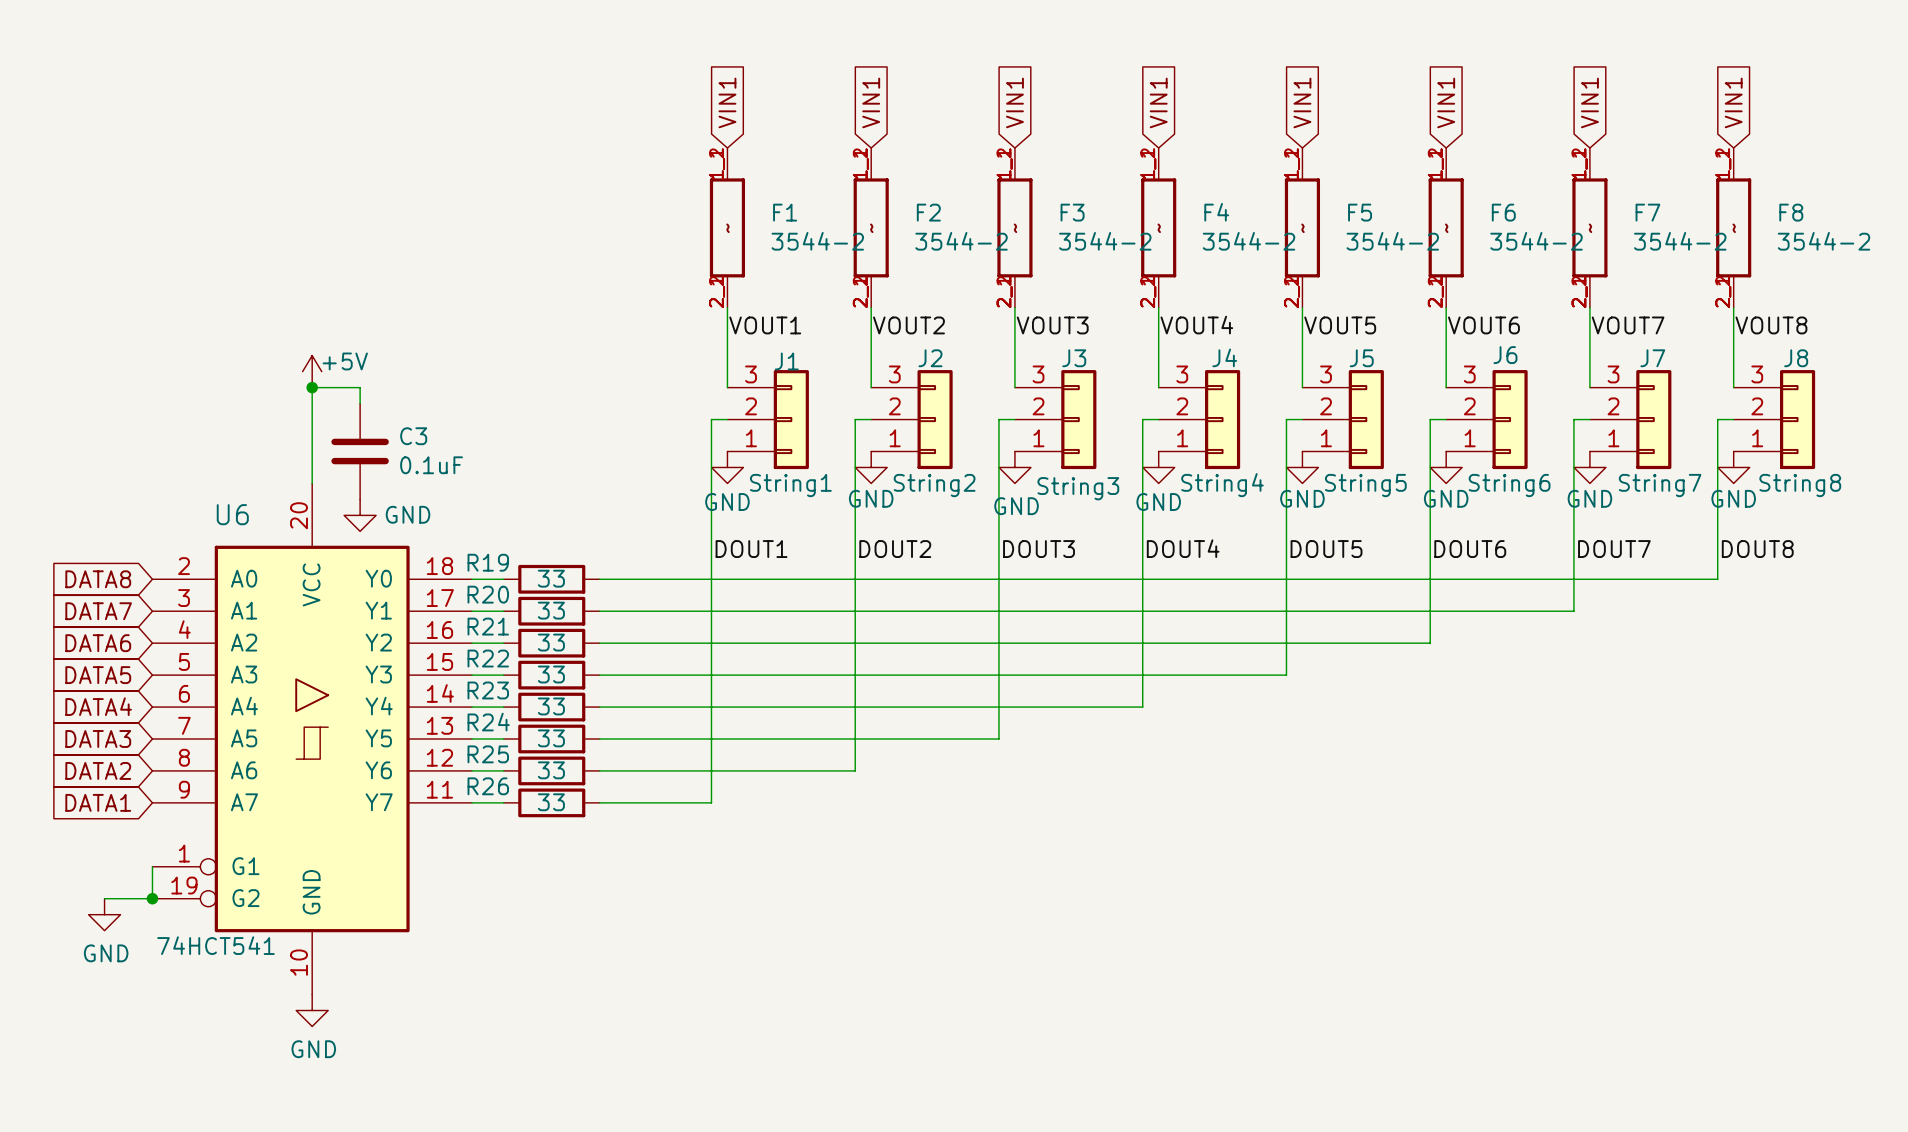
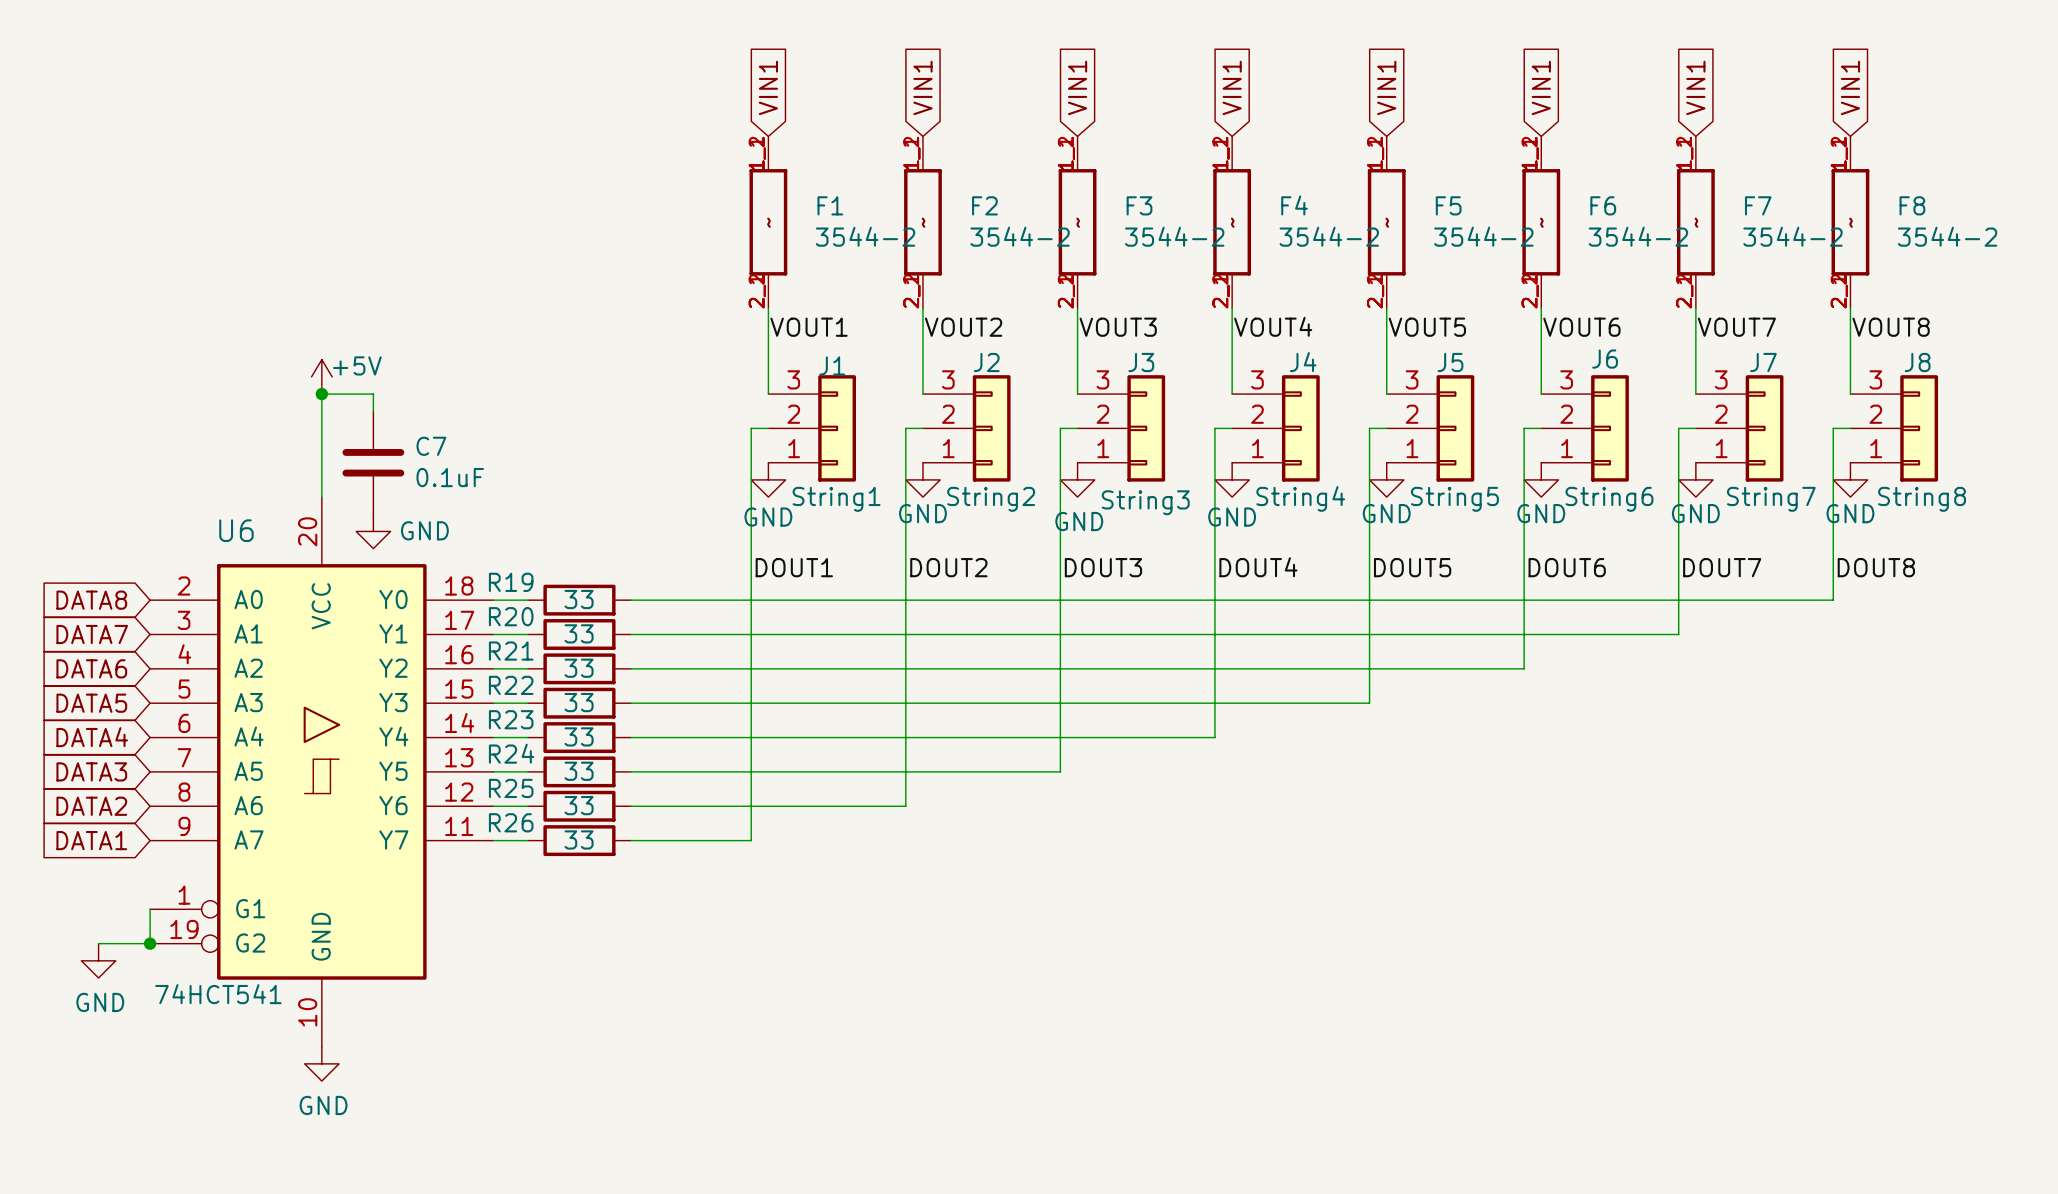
C3 name: C3 (413, 436) -> C7 (431, 446)

